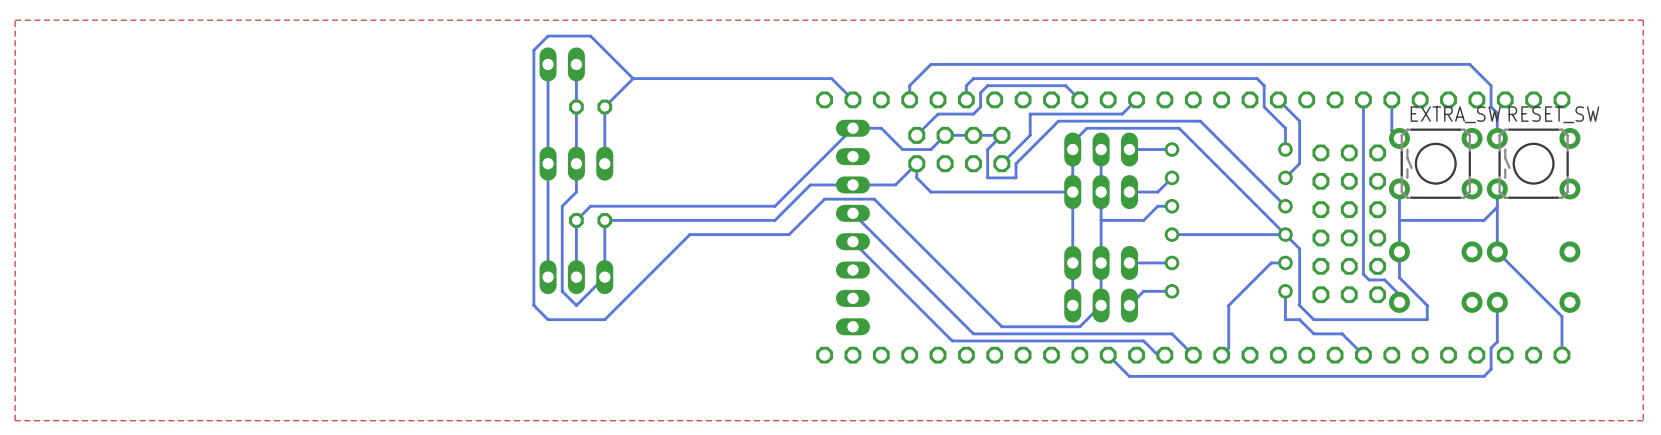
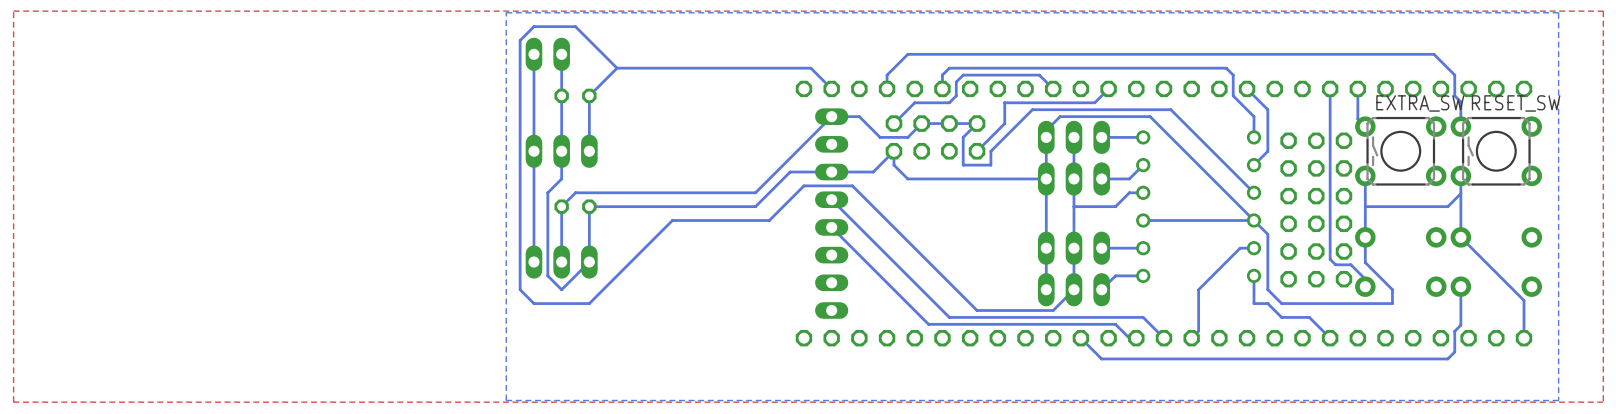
bottom zone outline: none -> (1558, 12) (1558, 400) (506, 400) (506, 12) (1558, 12)

